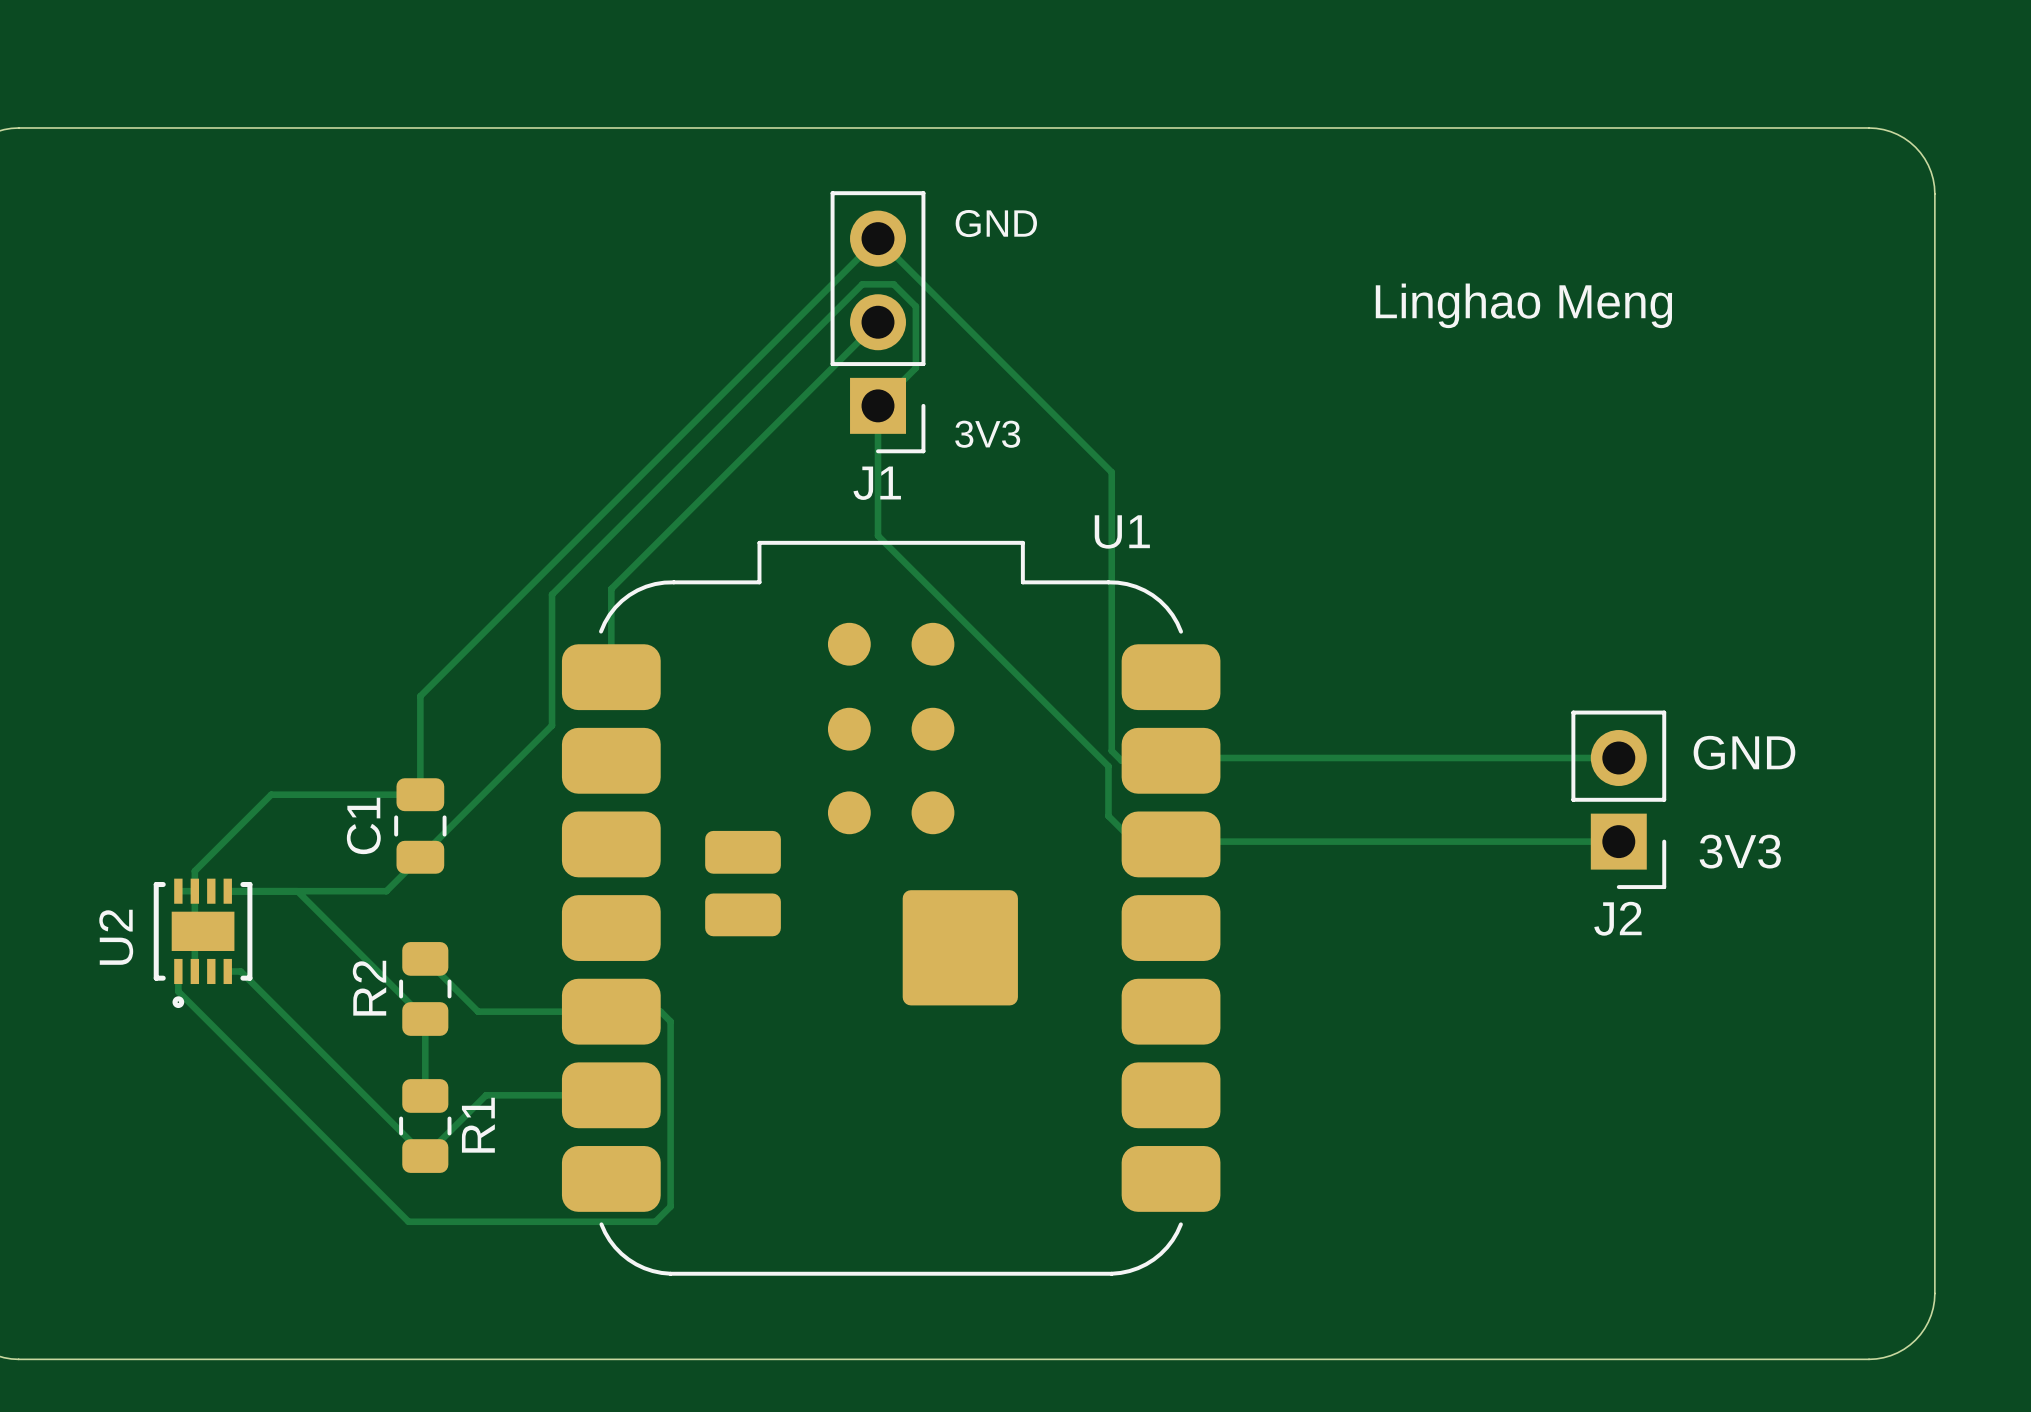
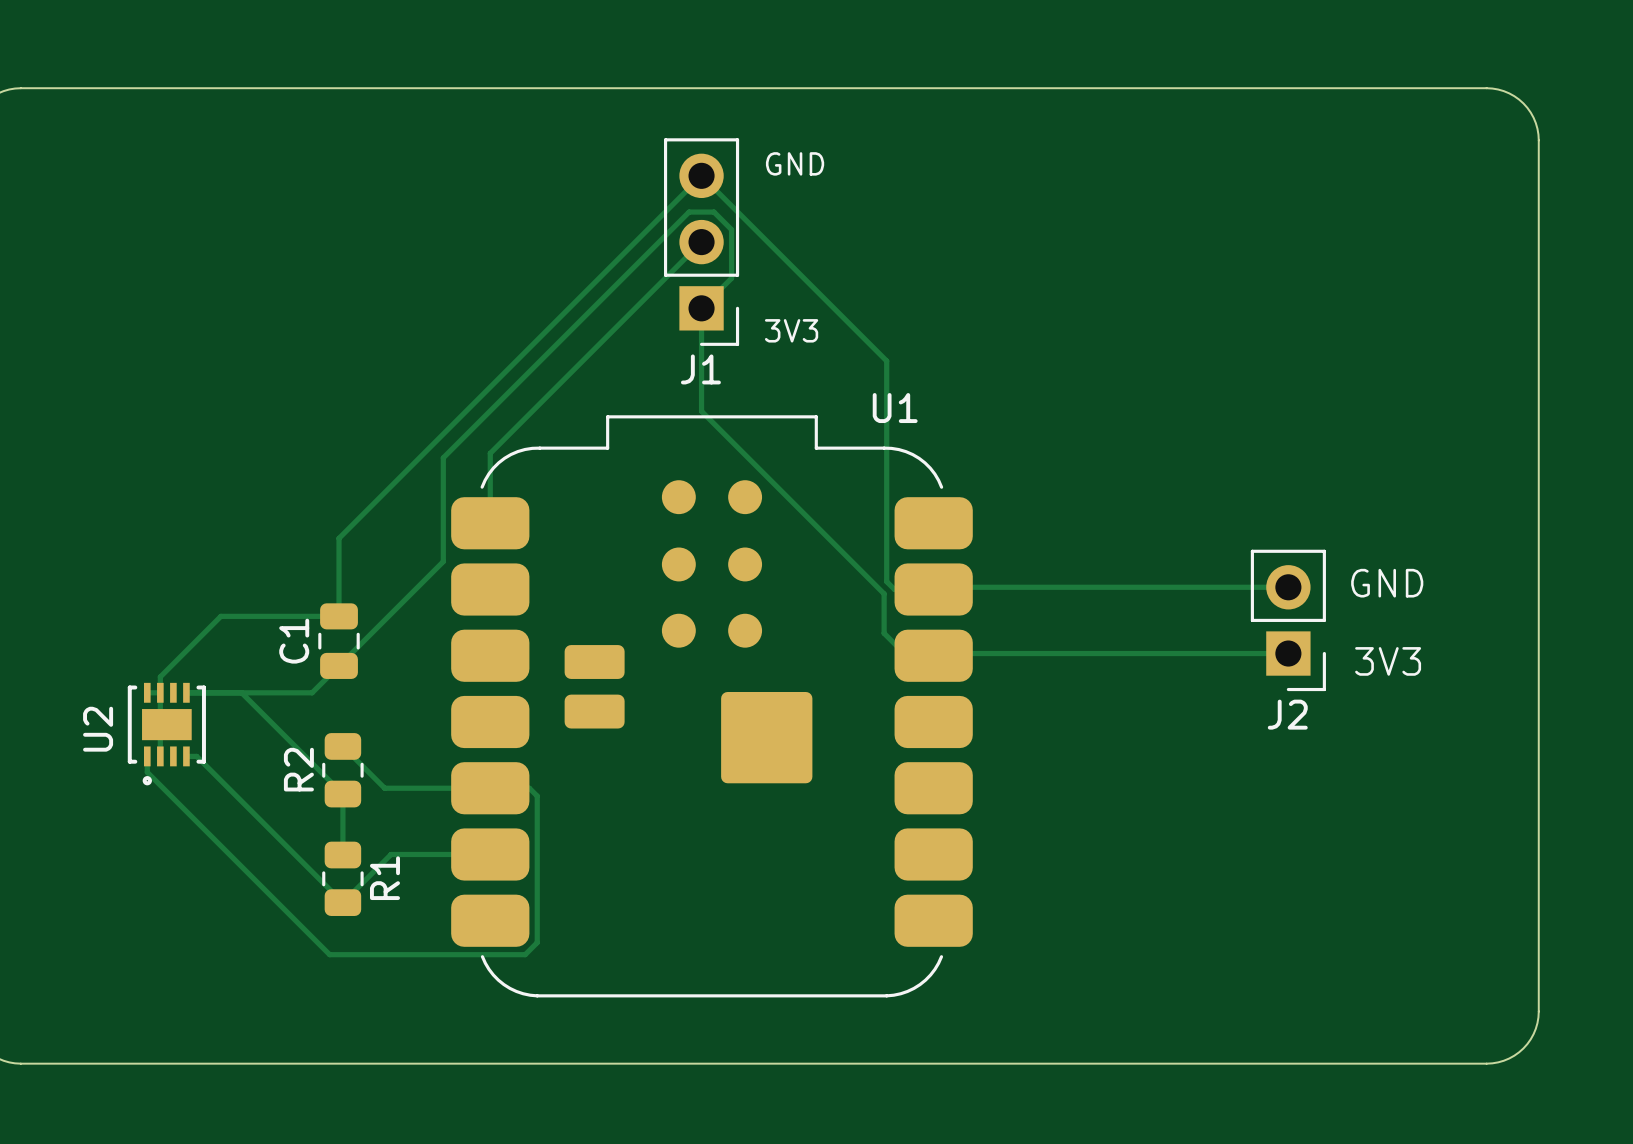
text: Linghao Meng (1523, 305) -> none

